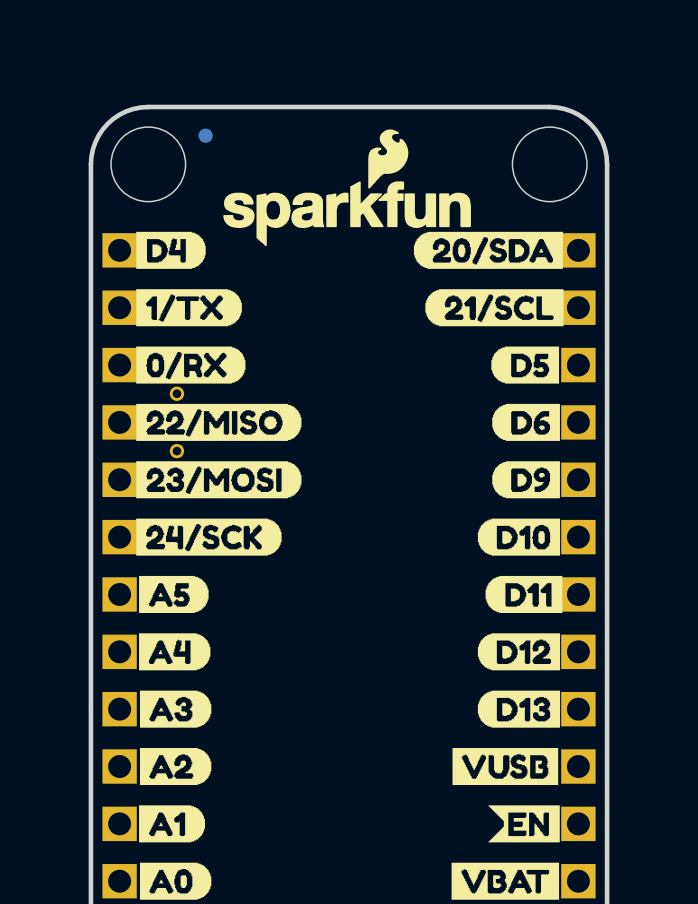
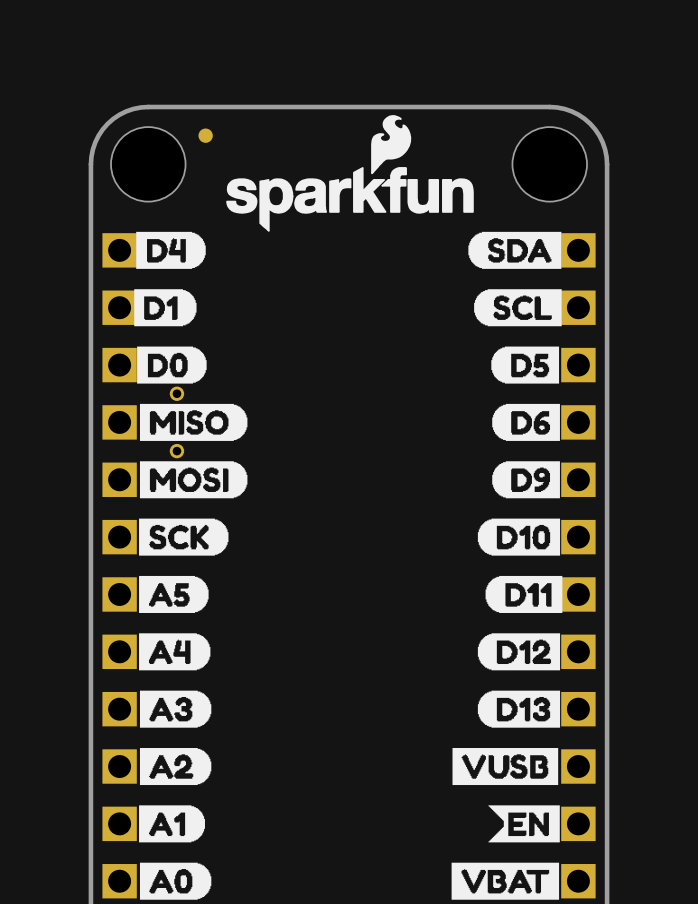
drawing shape: [223, 129, 471, 247] -> [226, 115, 474, 232]
drawing: [413, 231, 564, 327] -> none
drawing: none -> [468, 231, 562, 327]
drawing: none -> [134, 289, 197, 327]
drawing: [136, 289, 242, 327] -> none
drawing shape: [136, 346, 246, 384] -> [137, 346, 207, 384]
drawing: [136, 403, 302, 556] -> none
drawing: none -> [139, 403, 248, 556]

